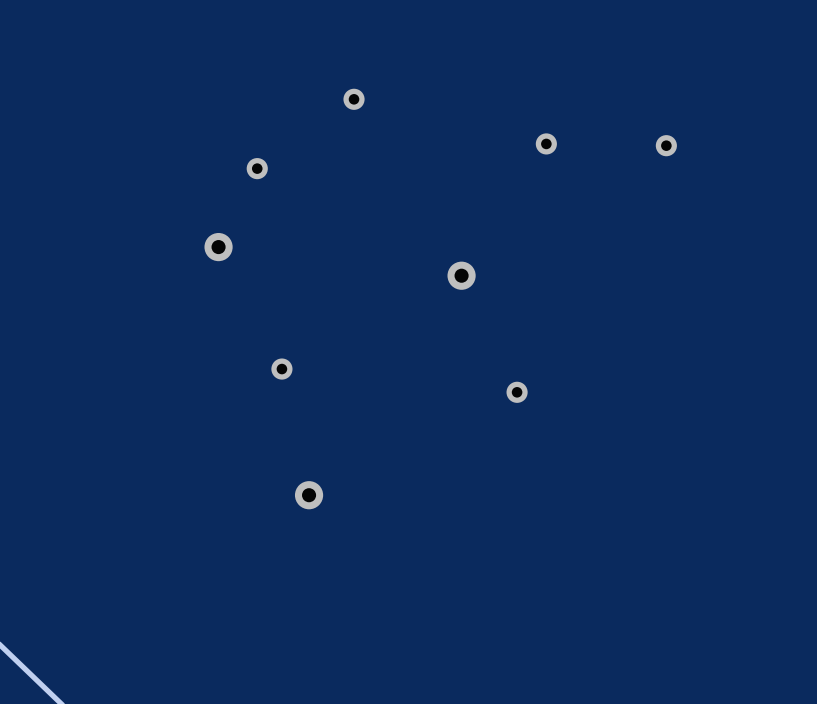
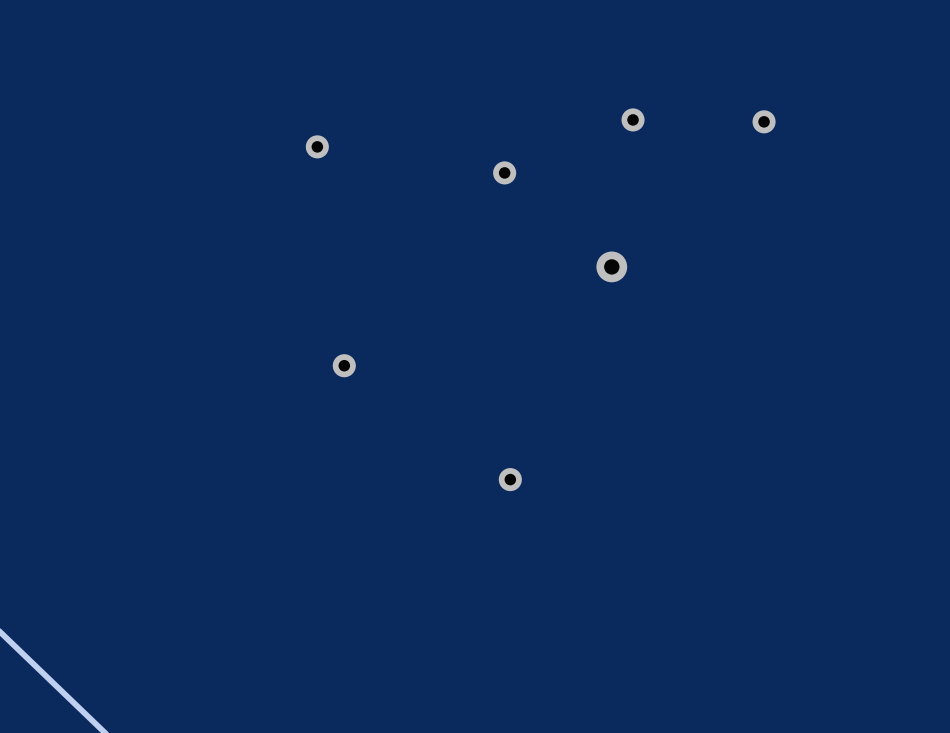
via: (354, 99) -> none
via: none -> (504, 172)
via: (218, 247) -> none
via position: (461, 275) -> (611, 266)
via: (517, 392) -> none
via: none -> (510, 479)
via: (309, 495) -> none

